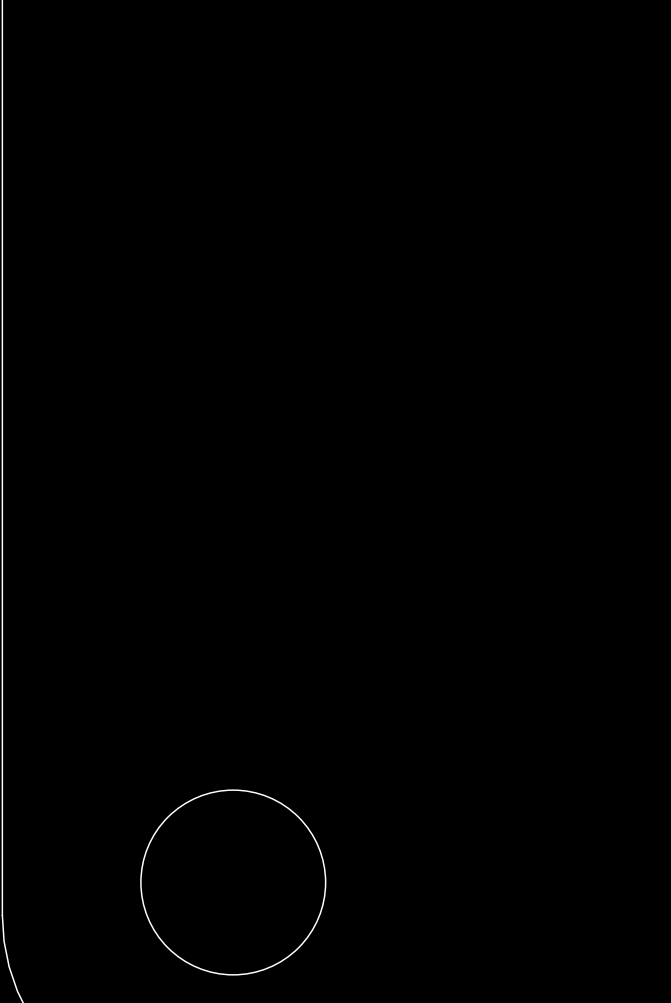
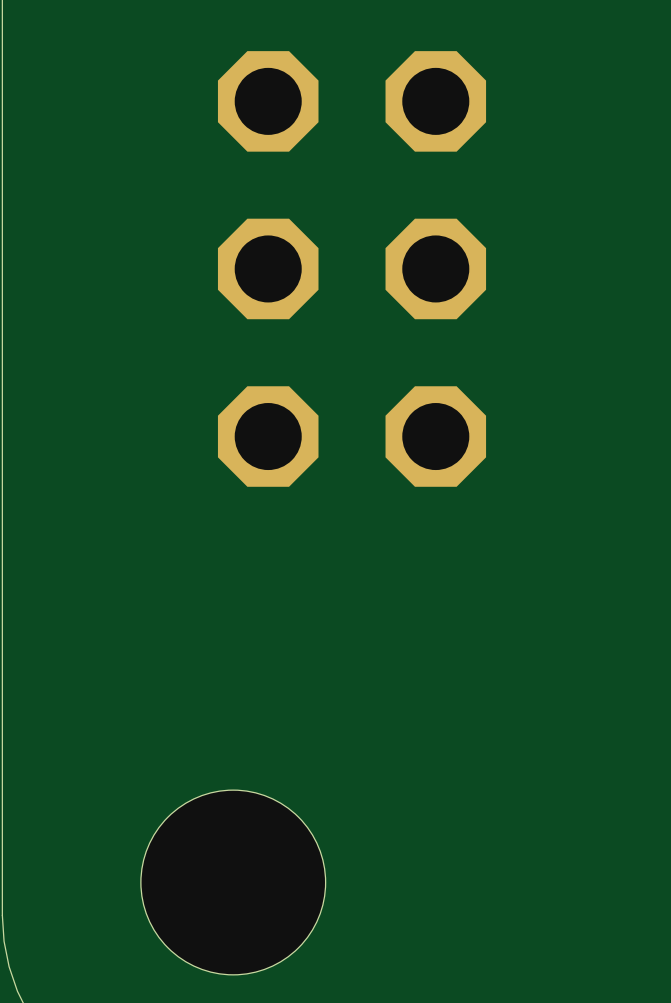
part: none -> (352, 268)

